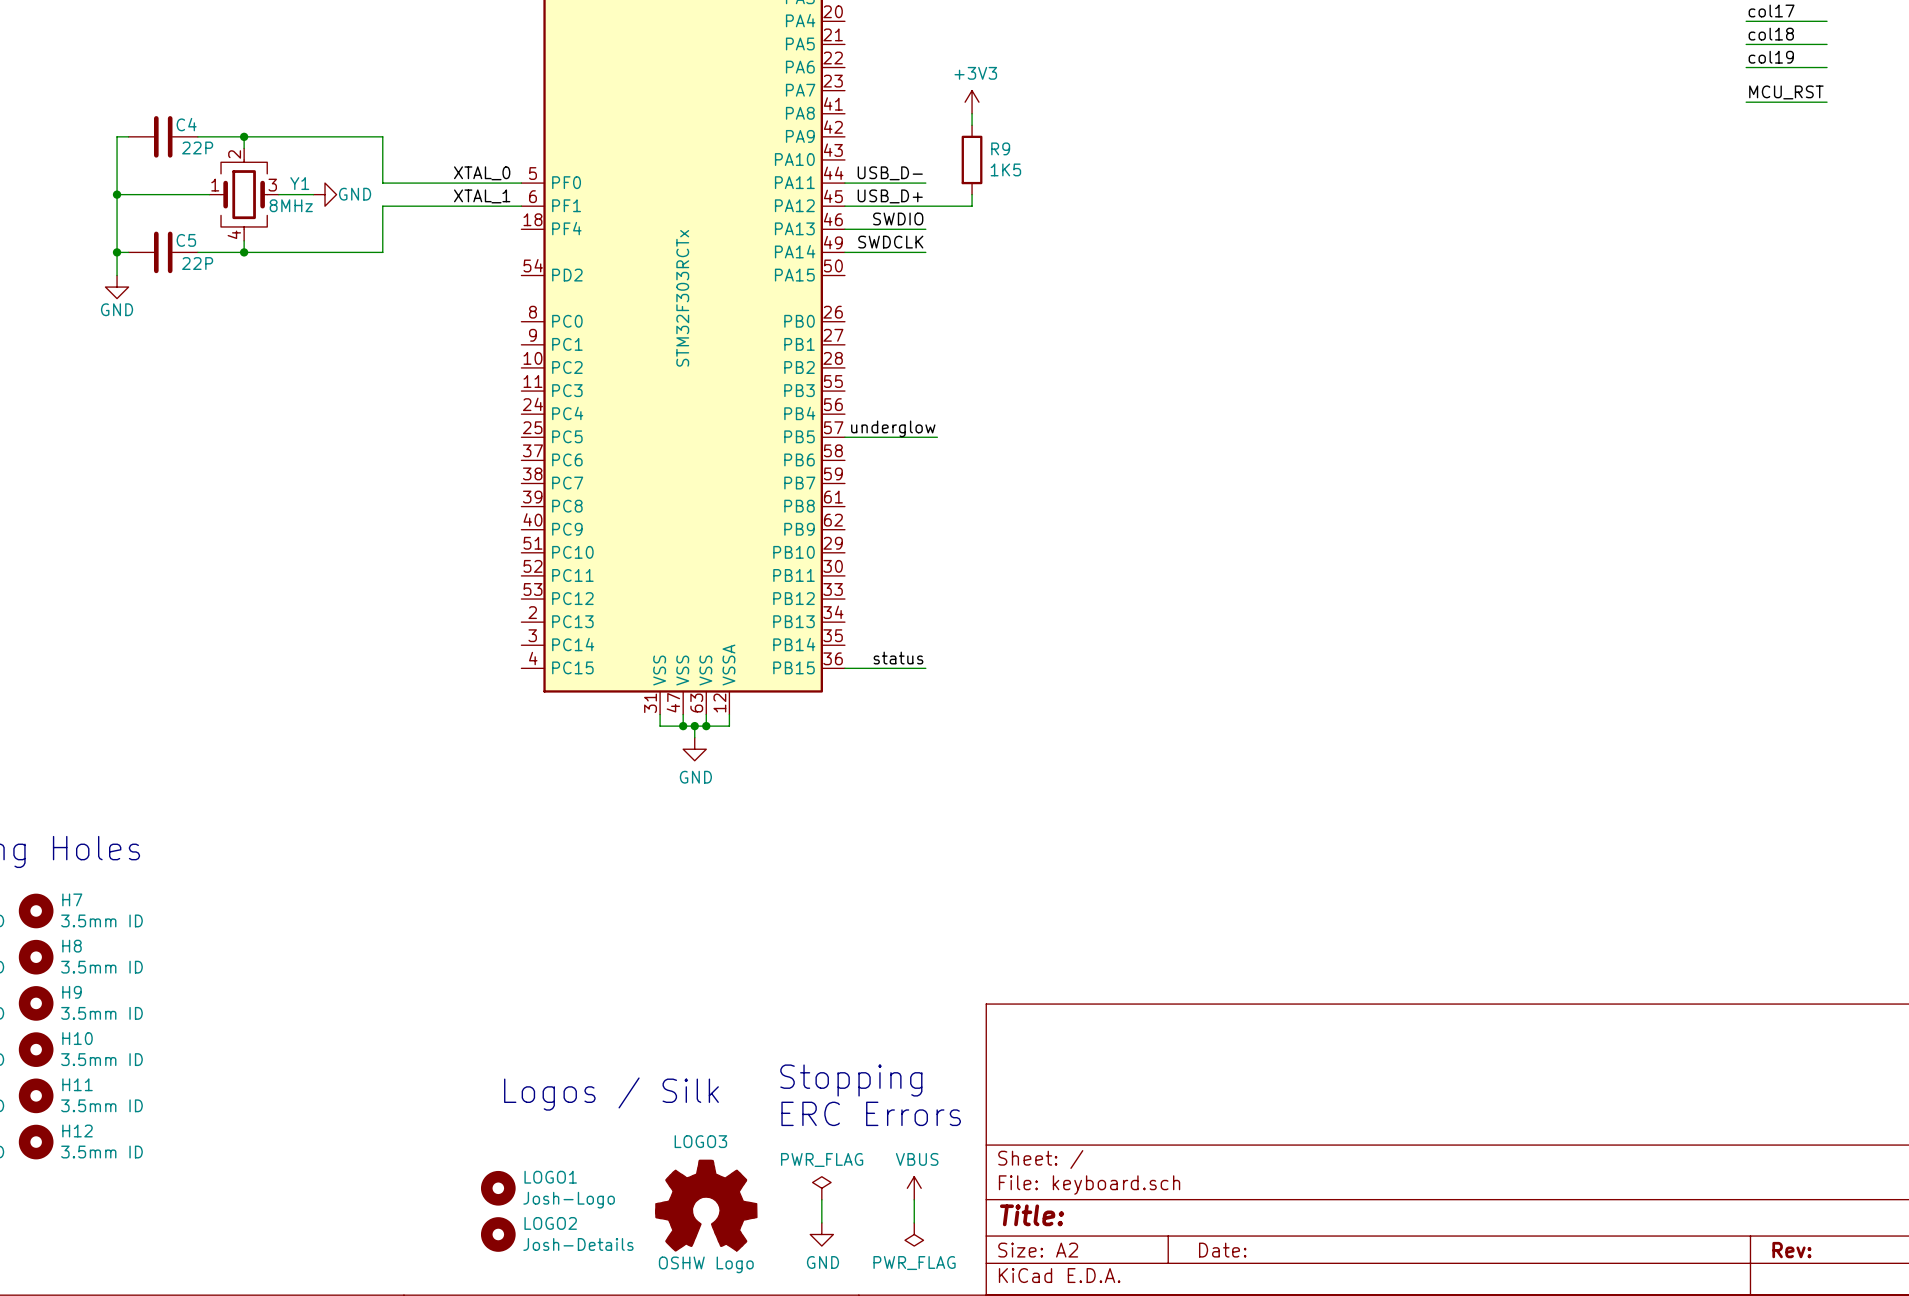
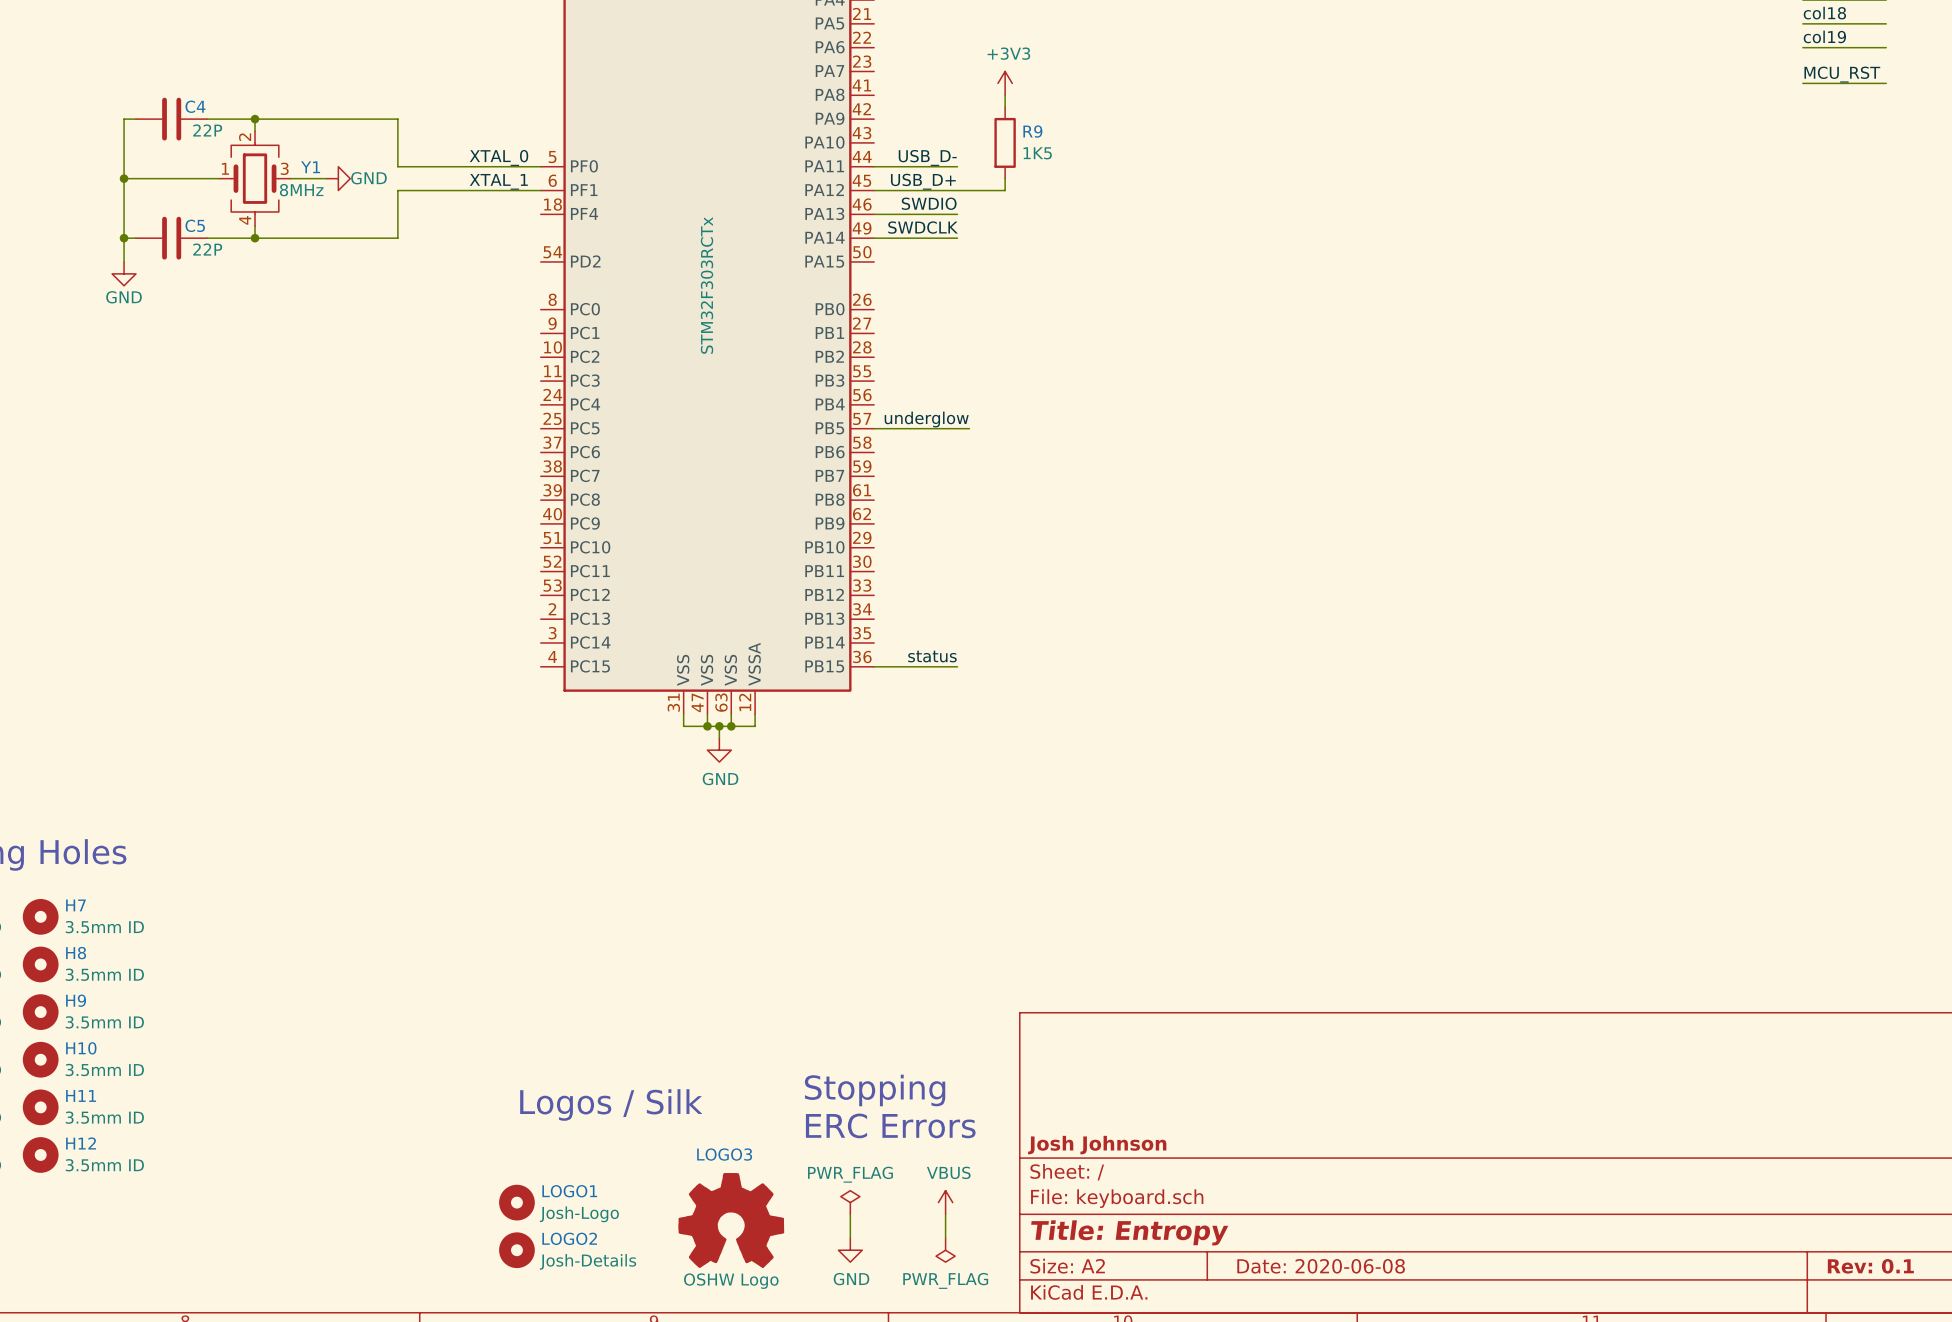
title block: none -> Josh Johnson (1097, 1145)
title block: Title: (1032, 1215) -> Title: Entropy (1129, 1232)
title block: Date: (1222, 1250) -> Date: 2020-06-08 (1321, 1266)
title block: Rev: (1791, 1250) -> Rev: 0.1 (1870, 1266)

